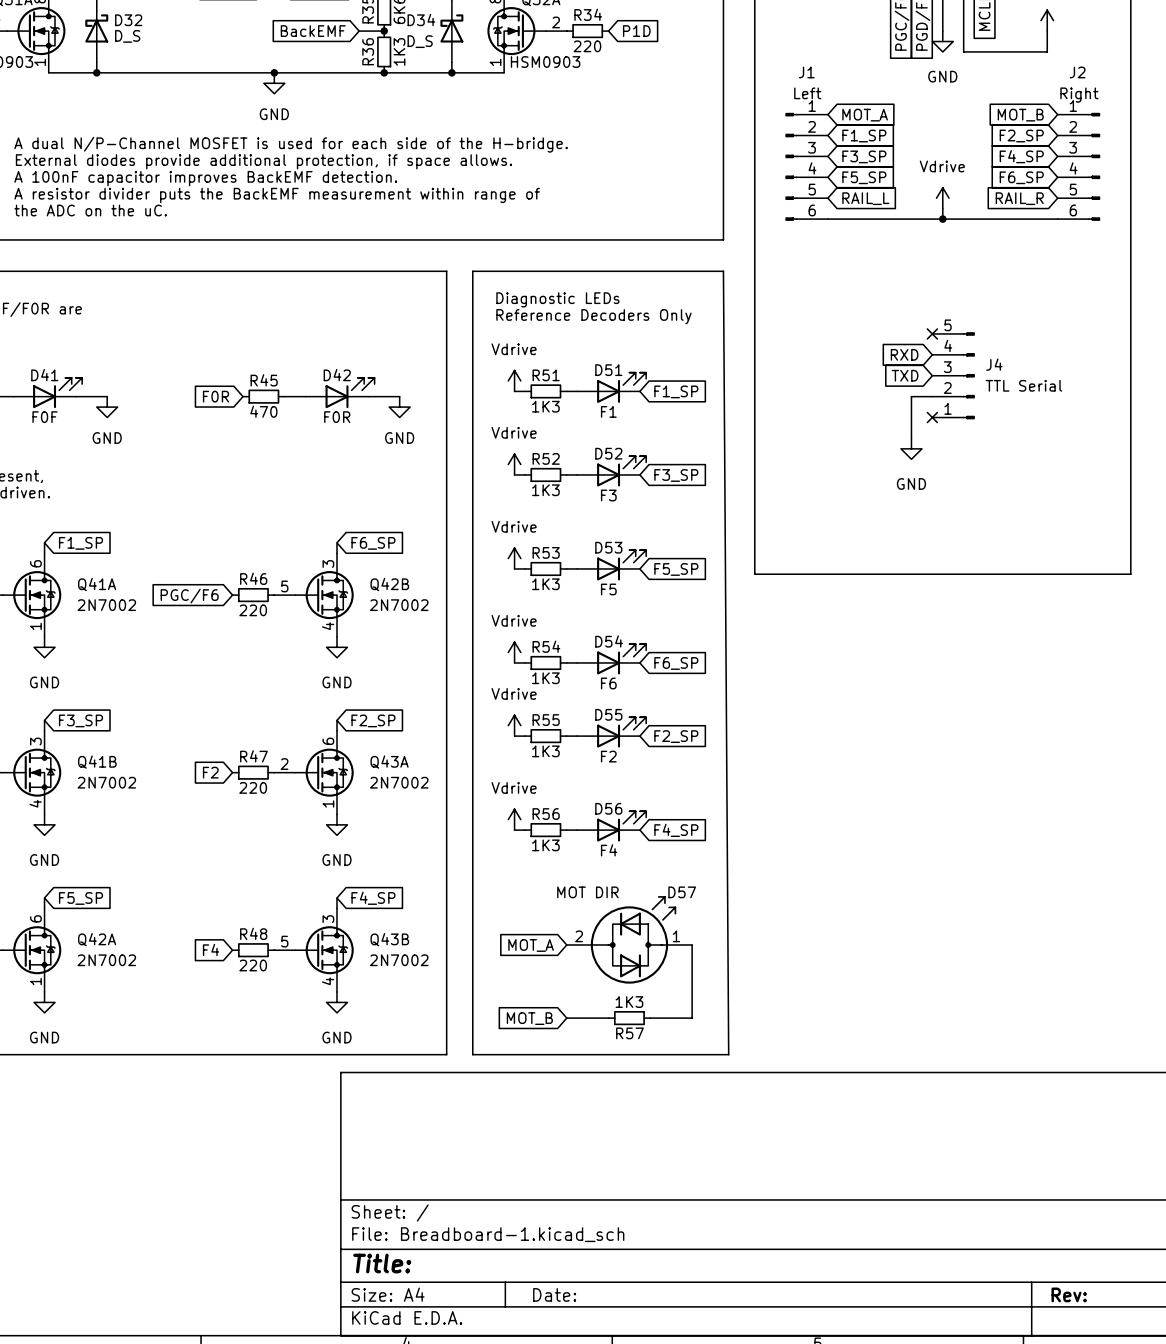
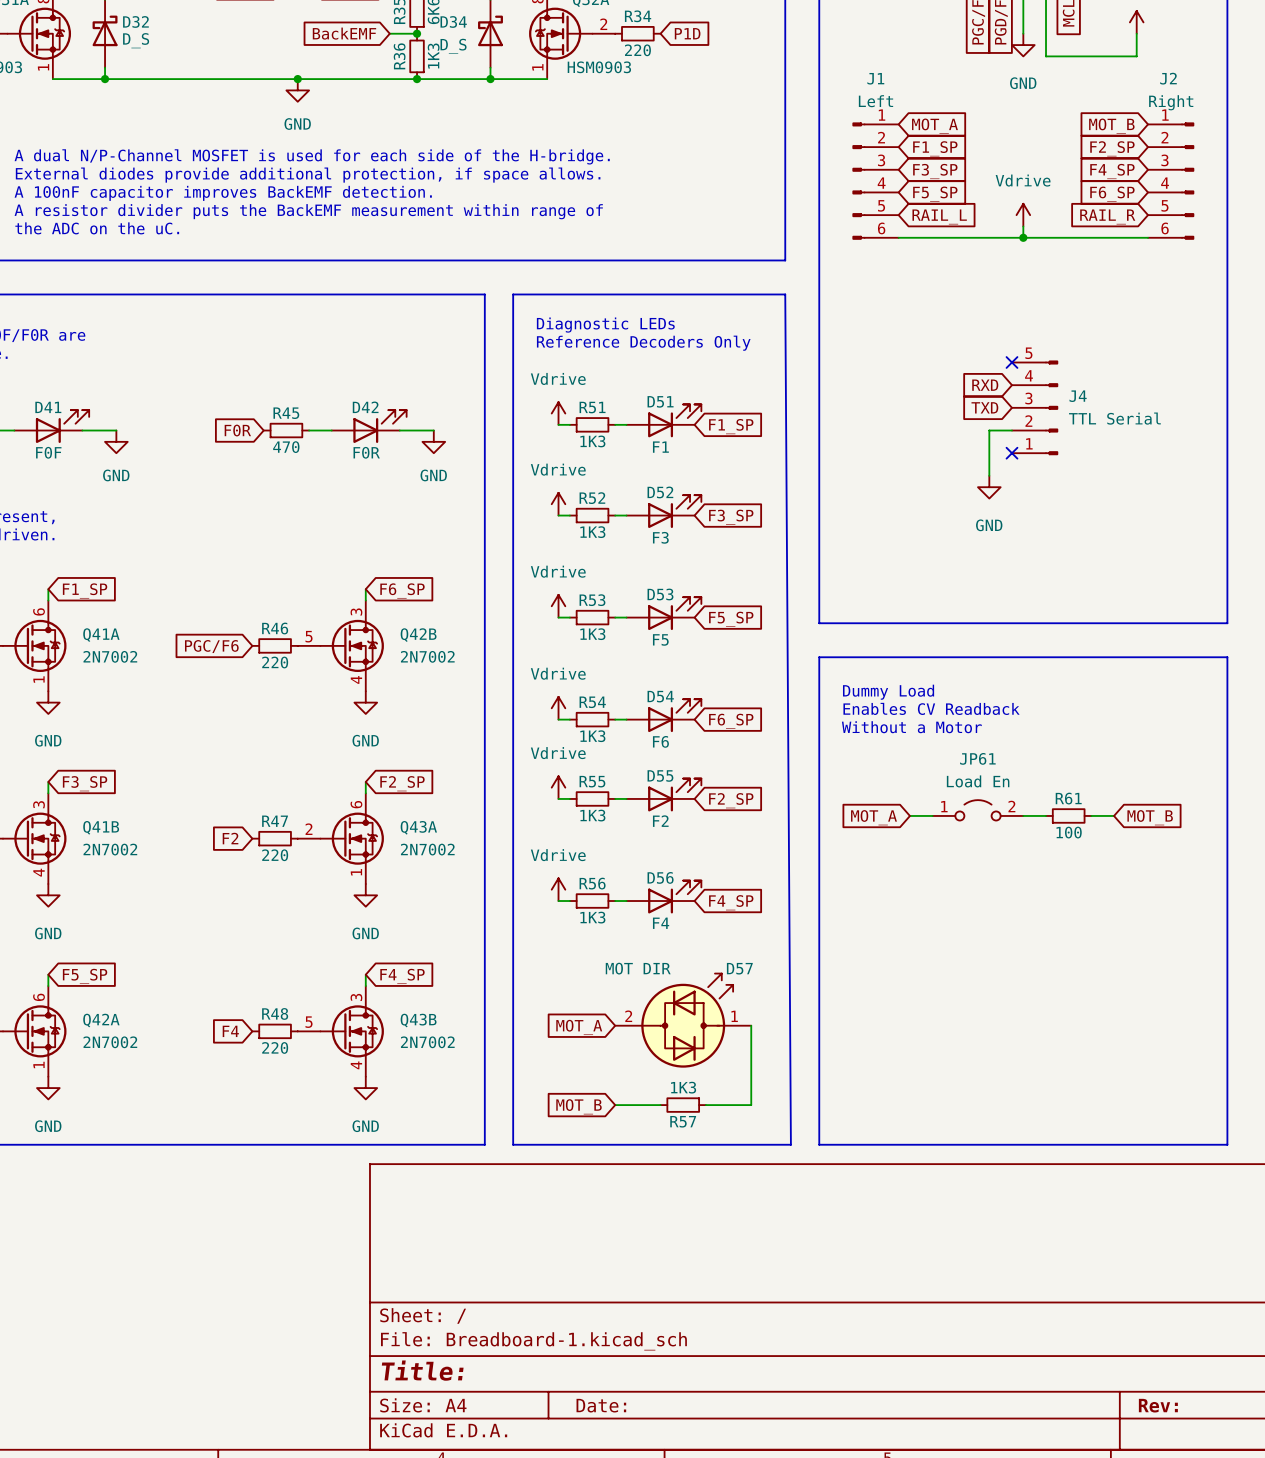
line: none -> (819, 657) (1227, 657) (1227, 1144) (819, 1144) (819, 657)
text: none -> Dummy Load (888, 692)
text: none -> Enables CV Readback (931, 708)
text: none -> Without a Motor (911, 727)
JP61: none -> Load En (977, 810)
wire: none -> (909, 815) (932, 815)
wire: none -> (1023, 815) (1046, 815)
R61: none -> 100 (1068, 815)
wire: none -> (1091, 815) (1114, 815)
global label: none -> MOT_A (873, 817)
global label: none -> MOT_B (1150, 817)

